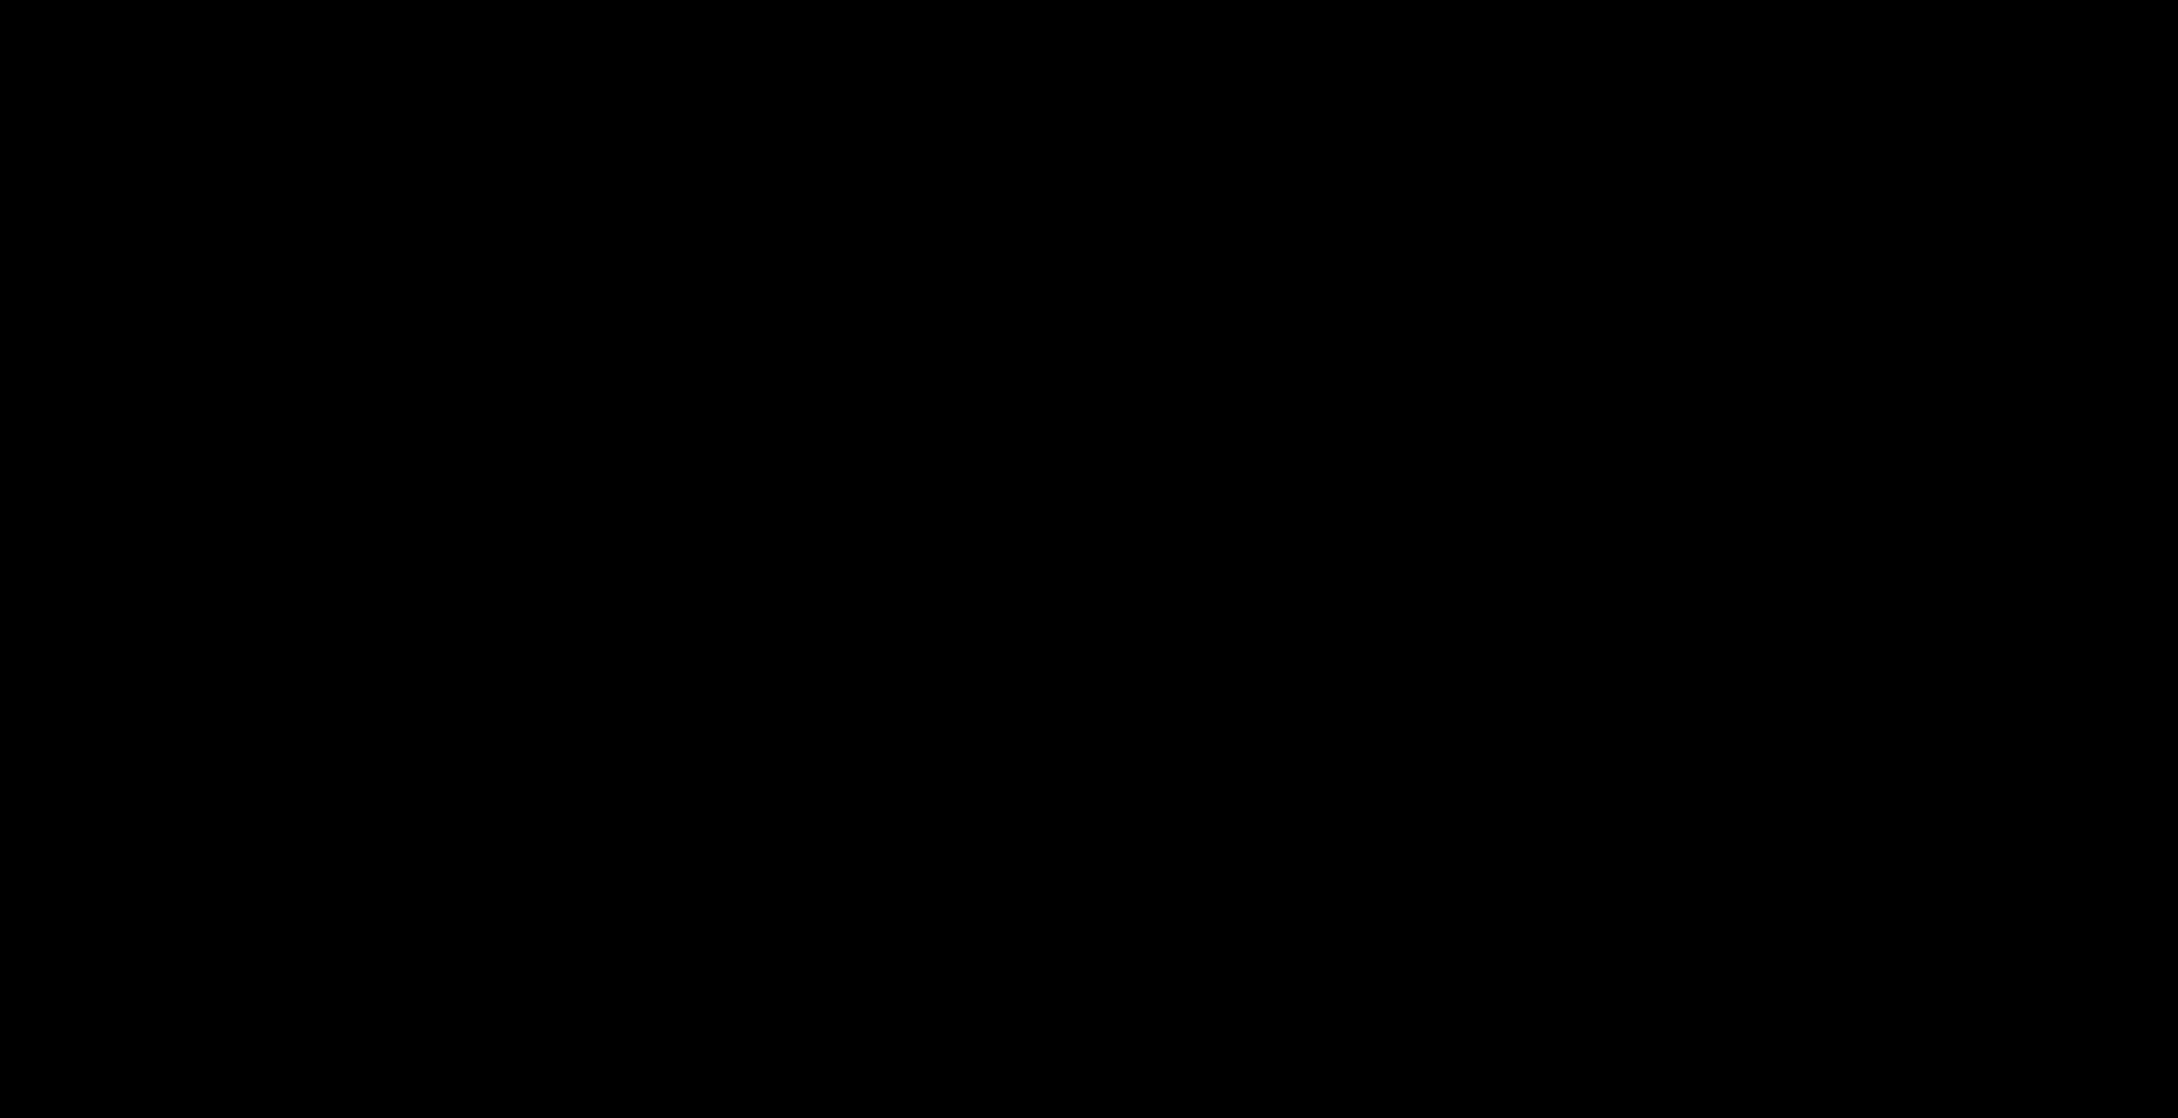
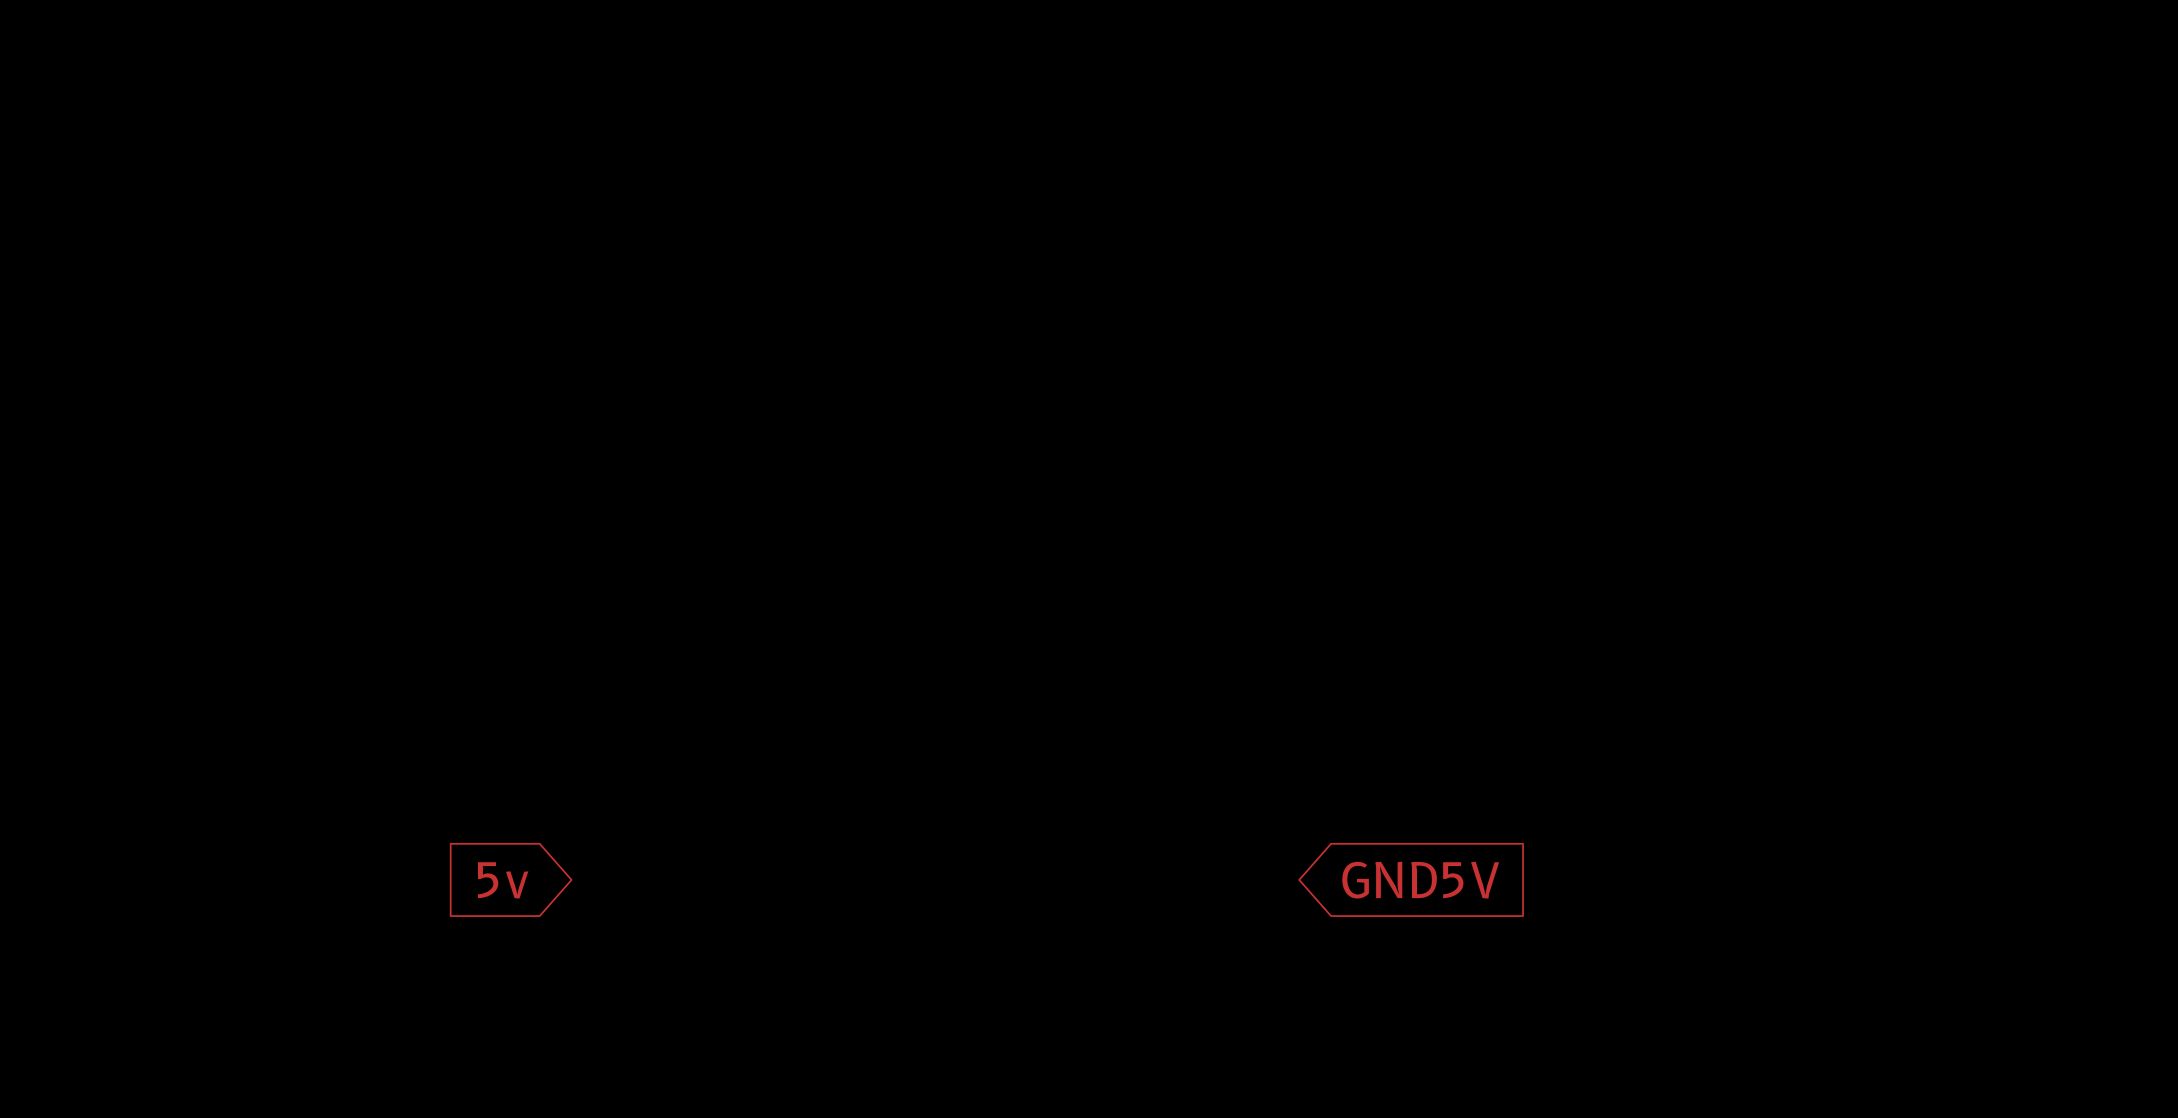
global label: none -> 5v (503, 880)
global label: none -> GND5V (1420, 880)

